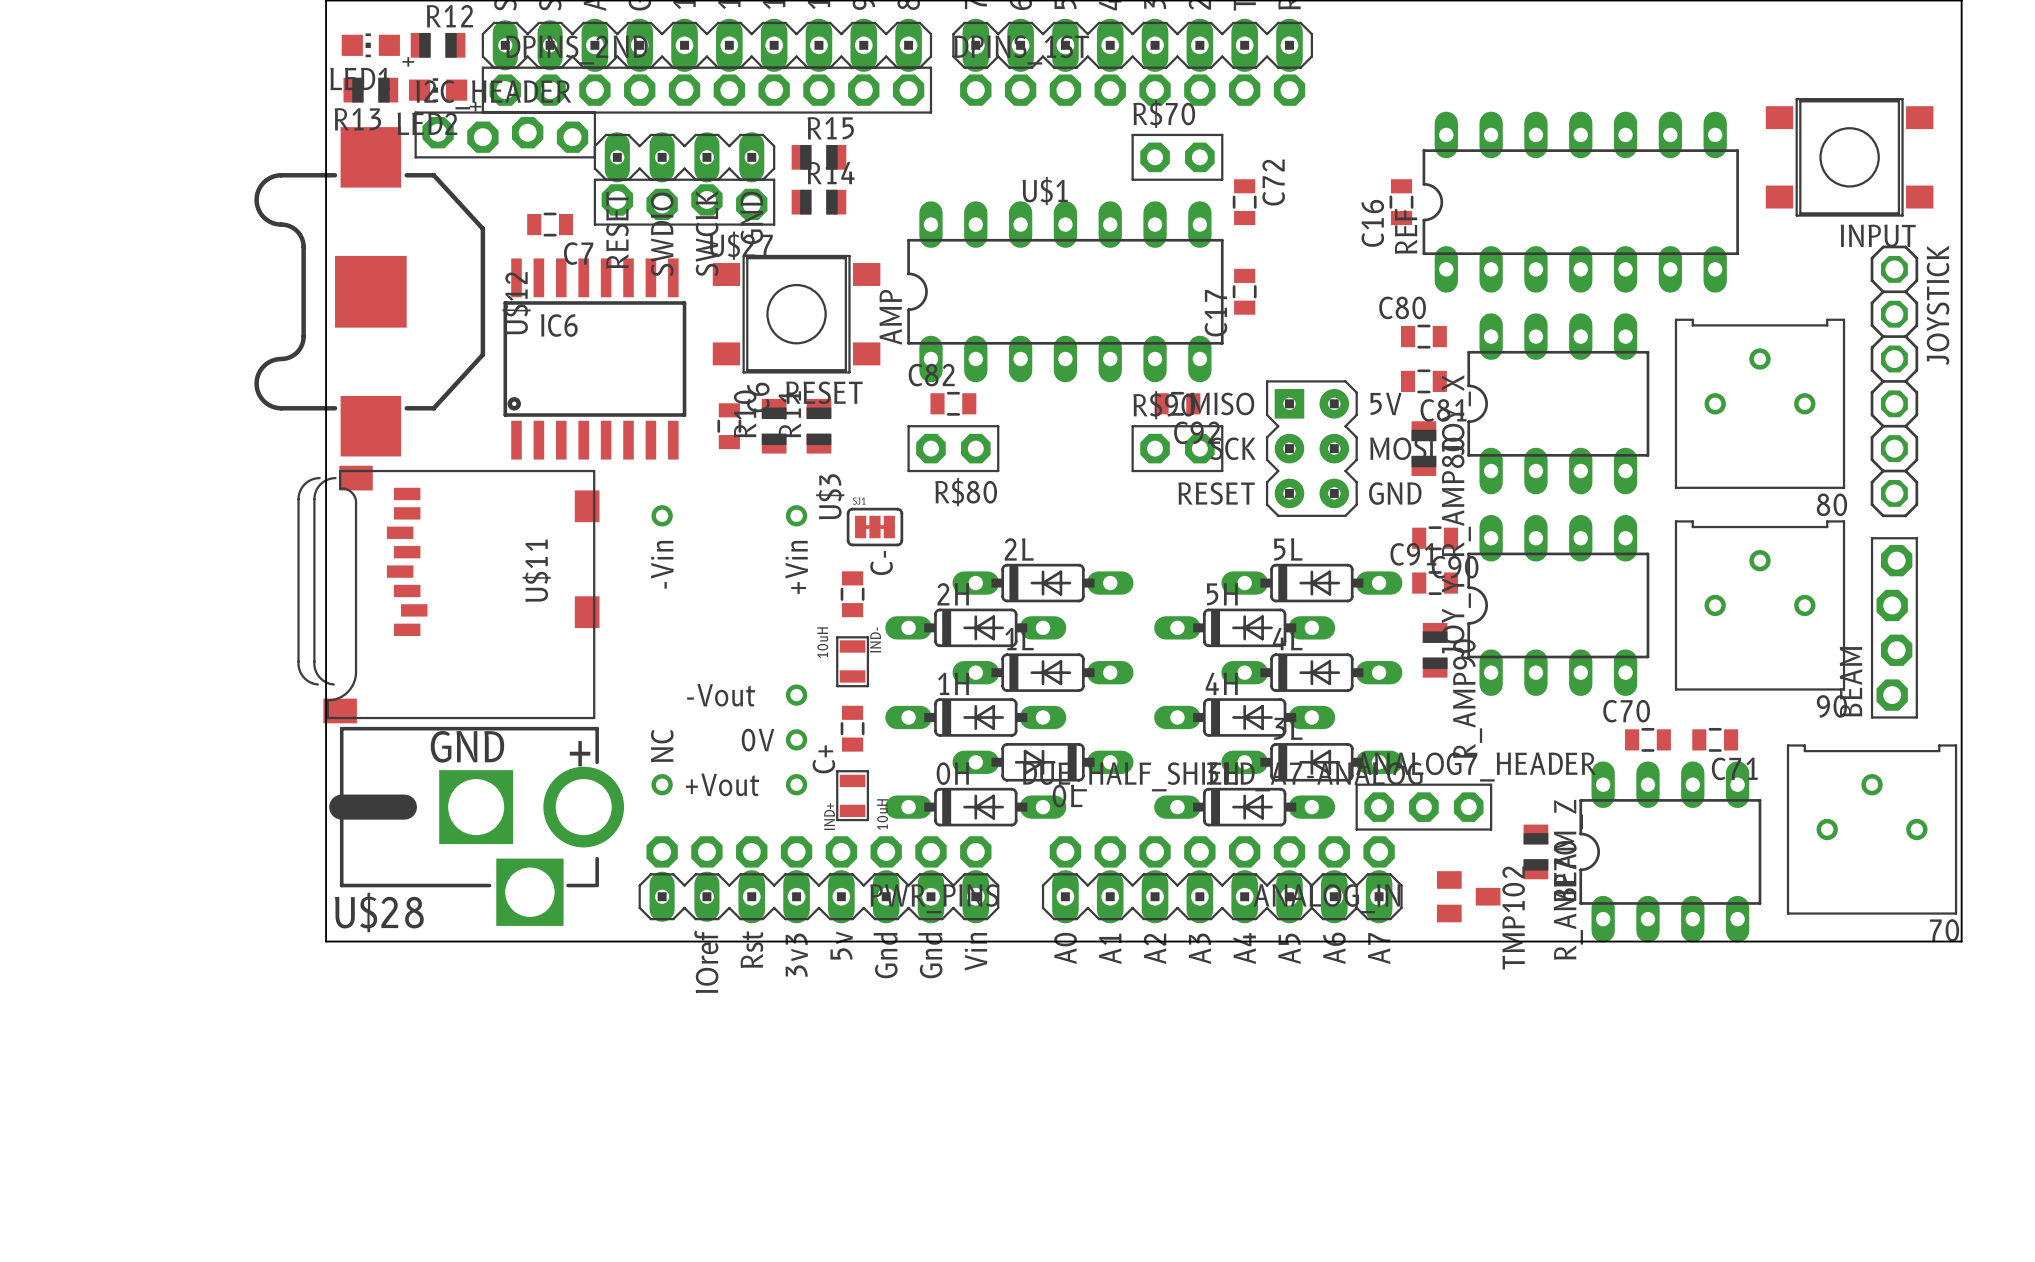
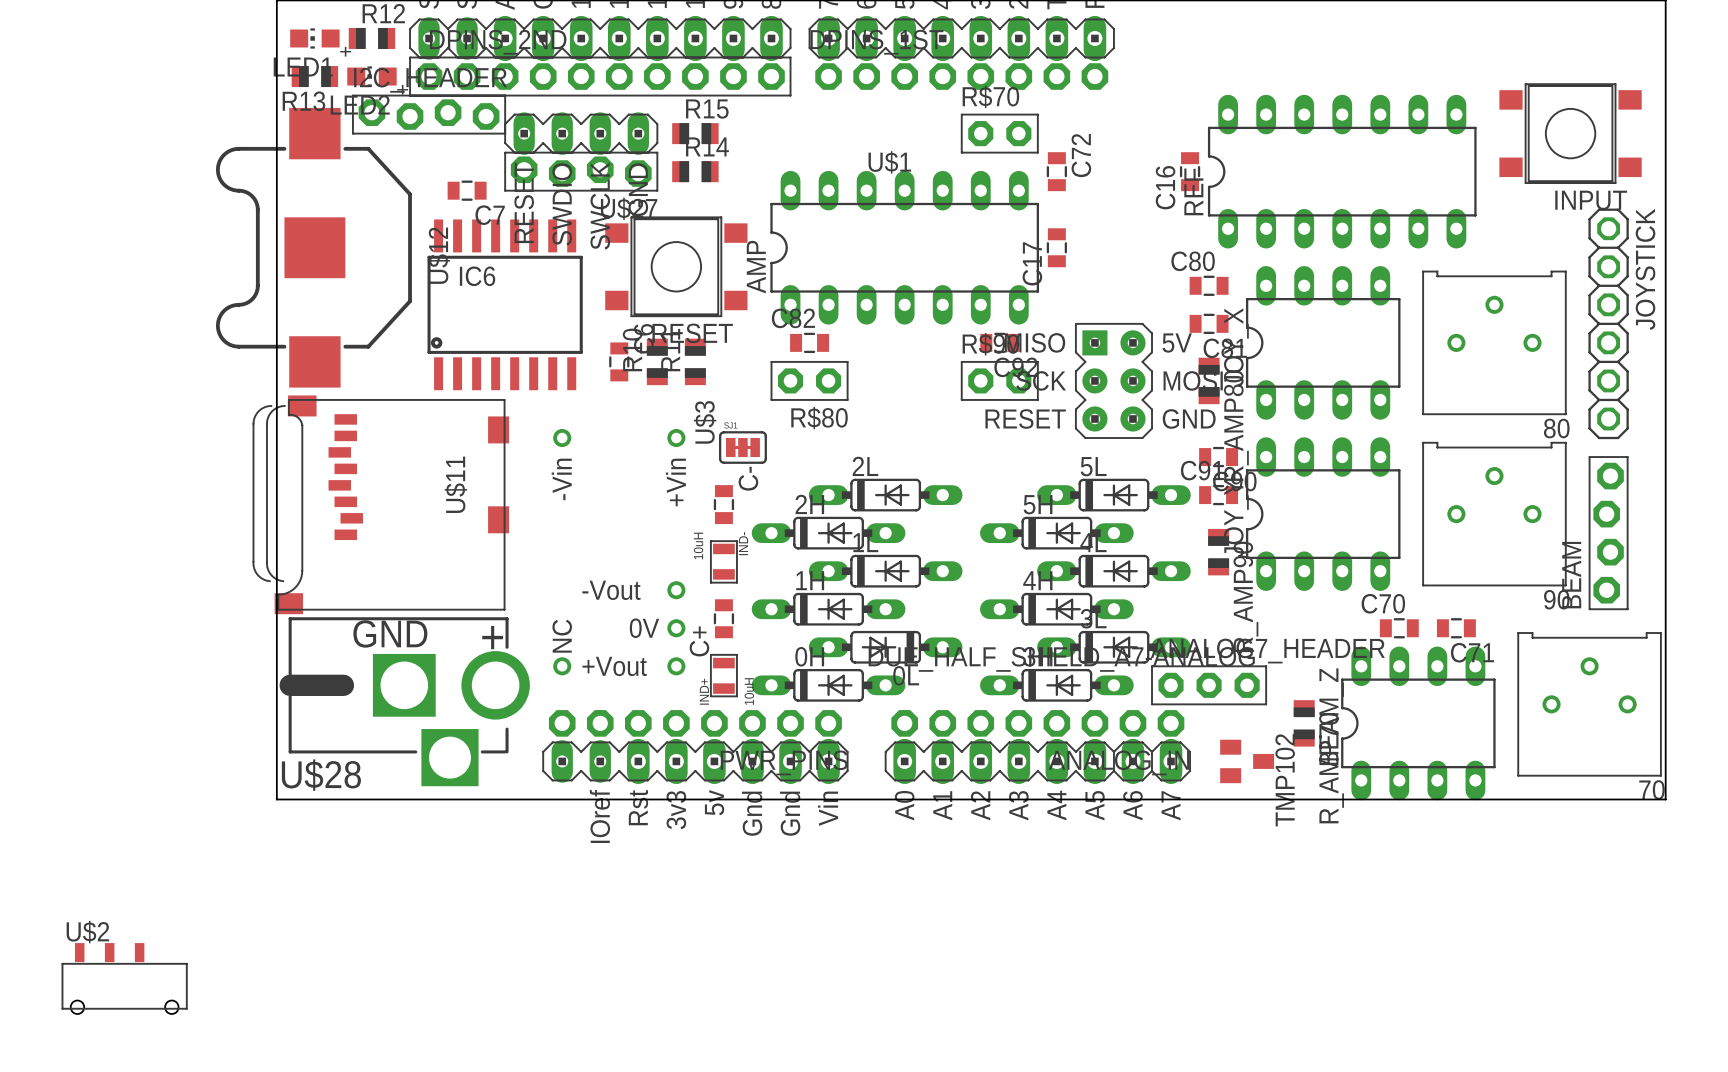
U$2: none -> (124, 978)

